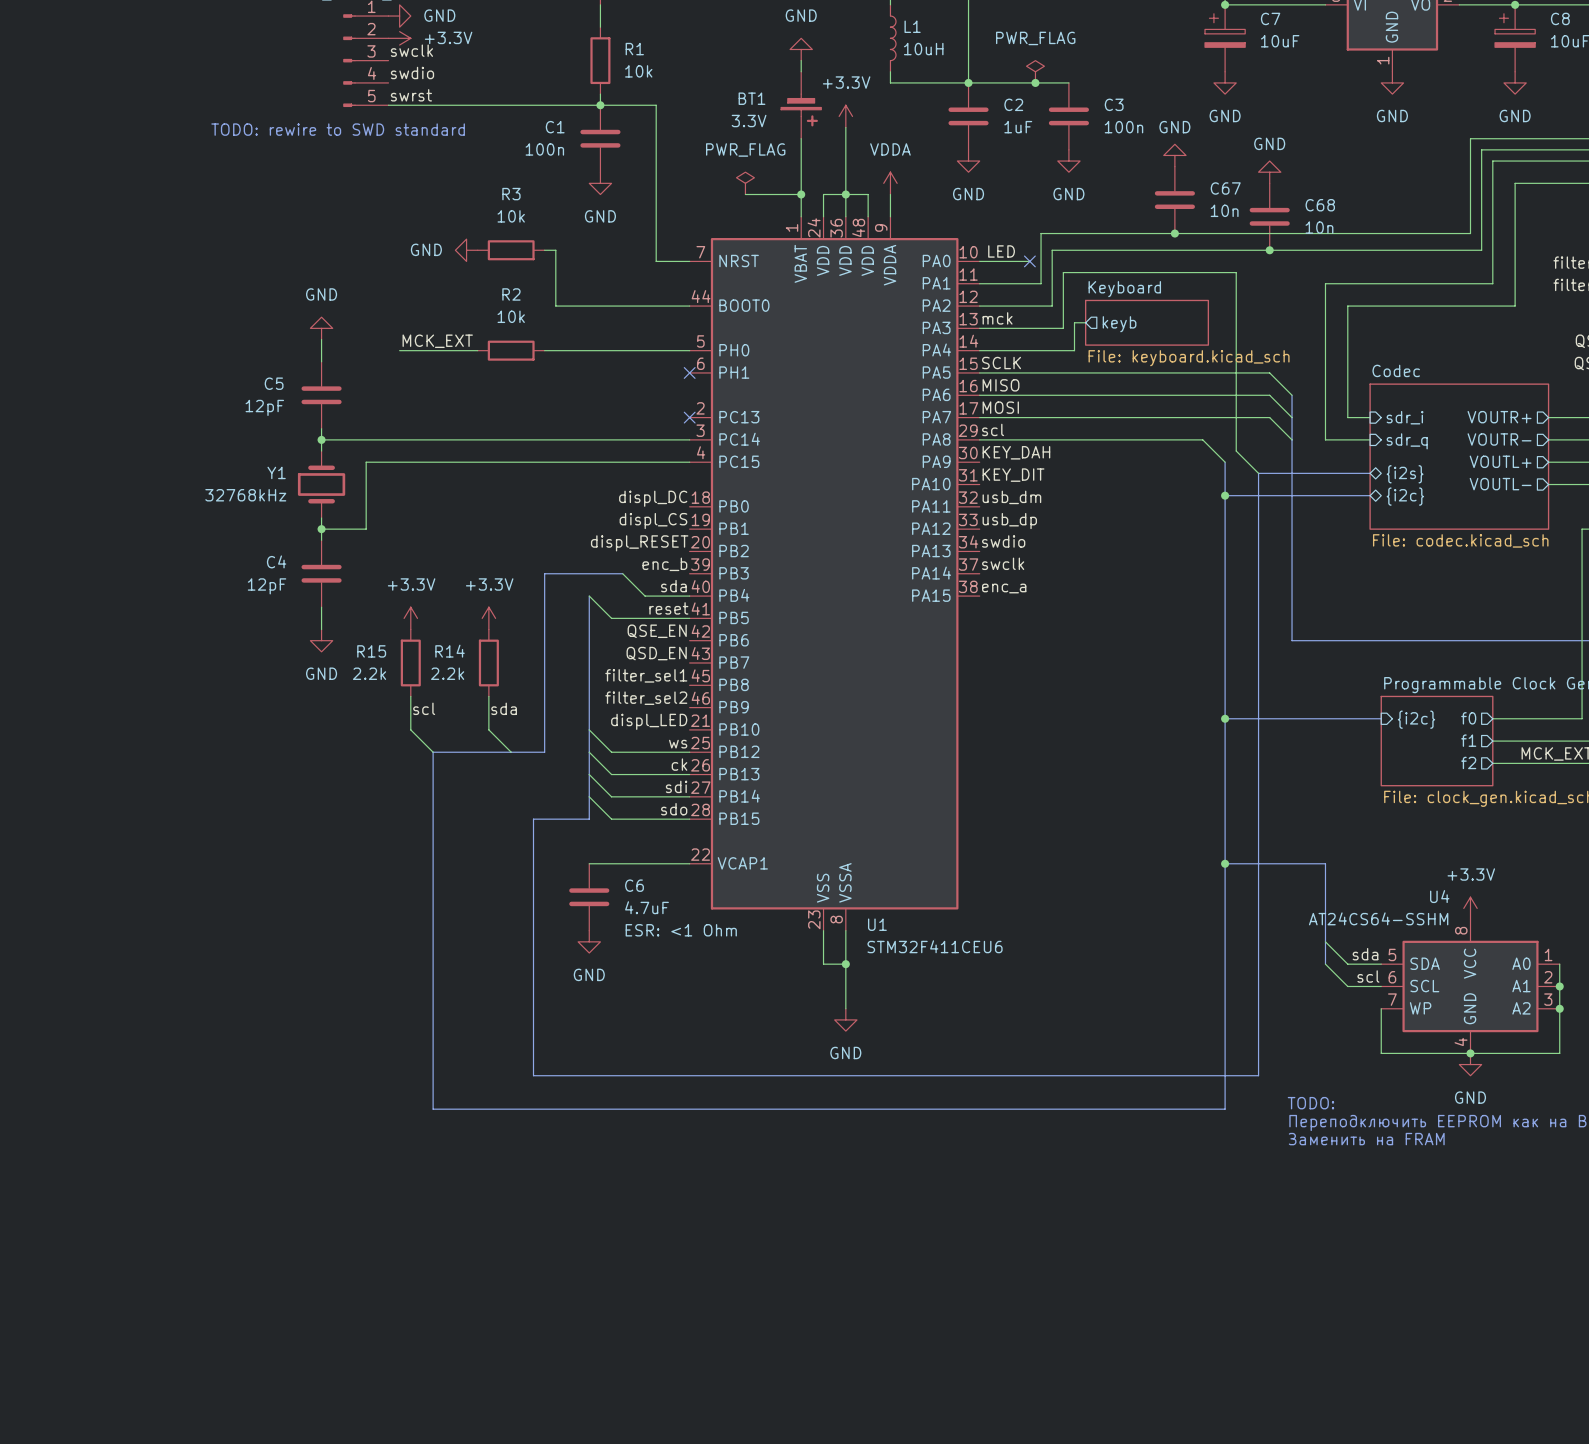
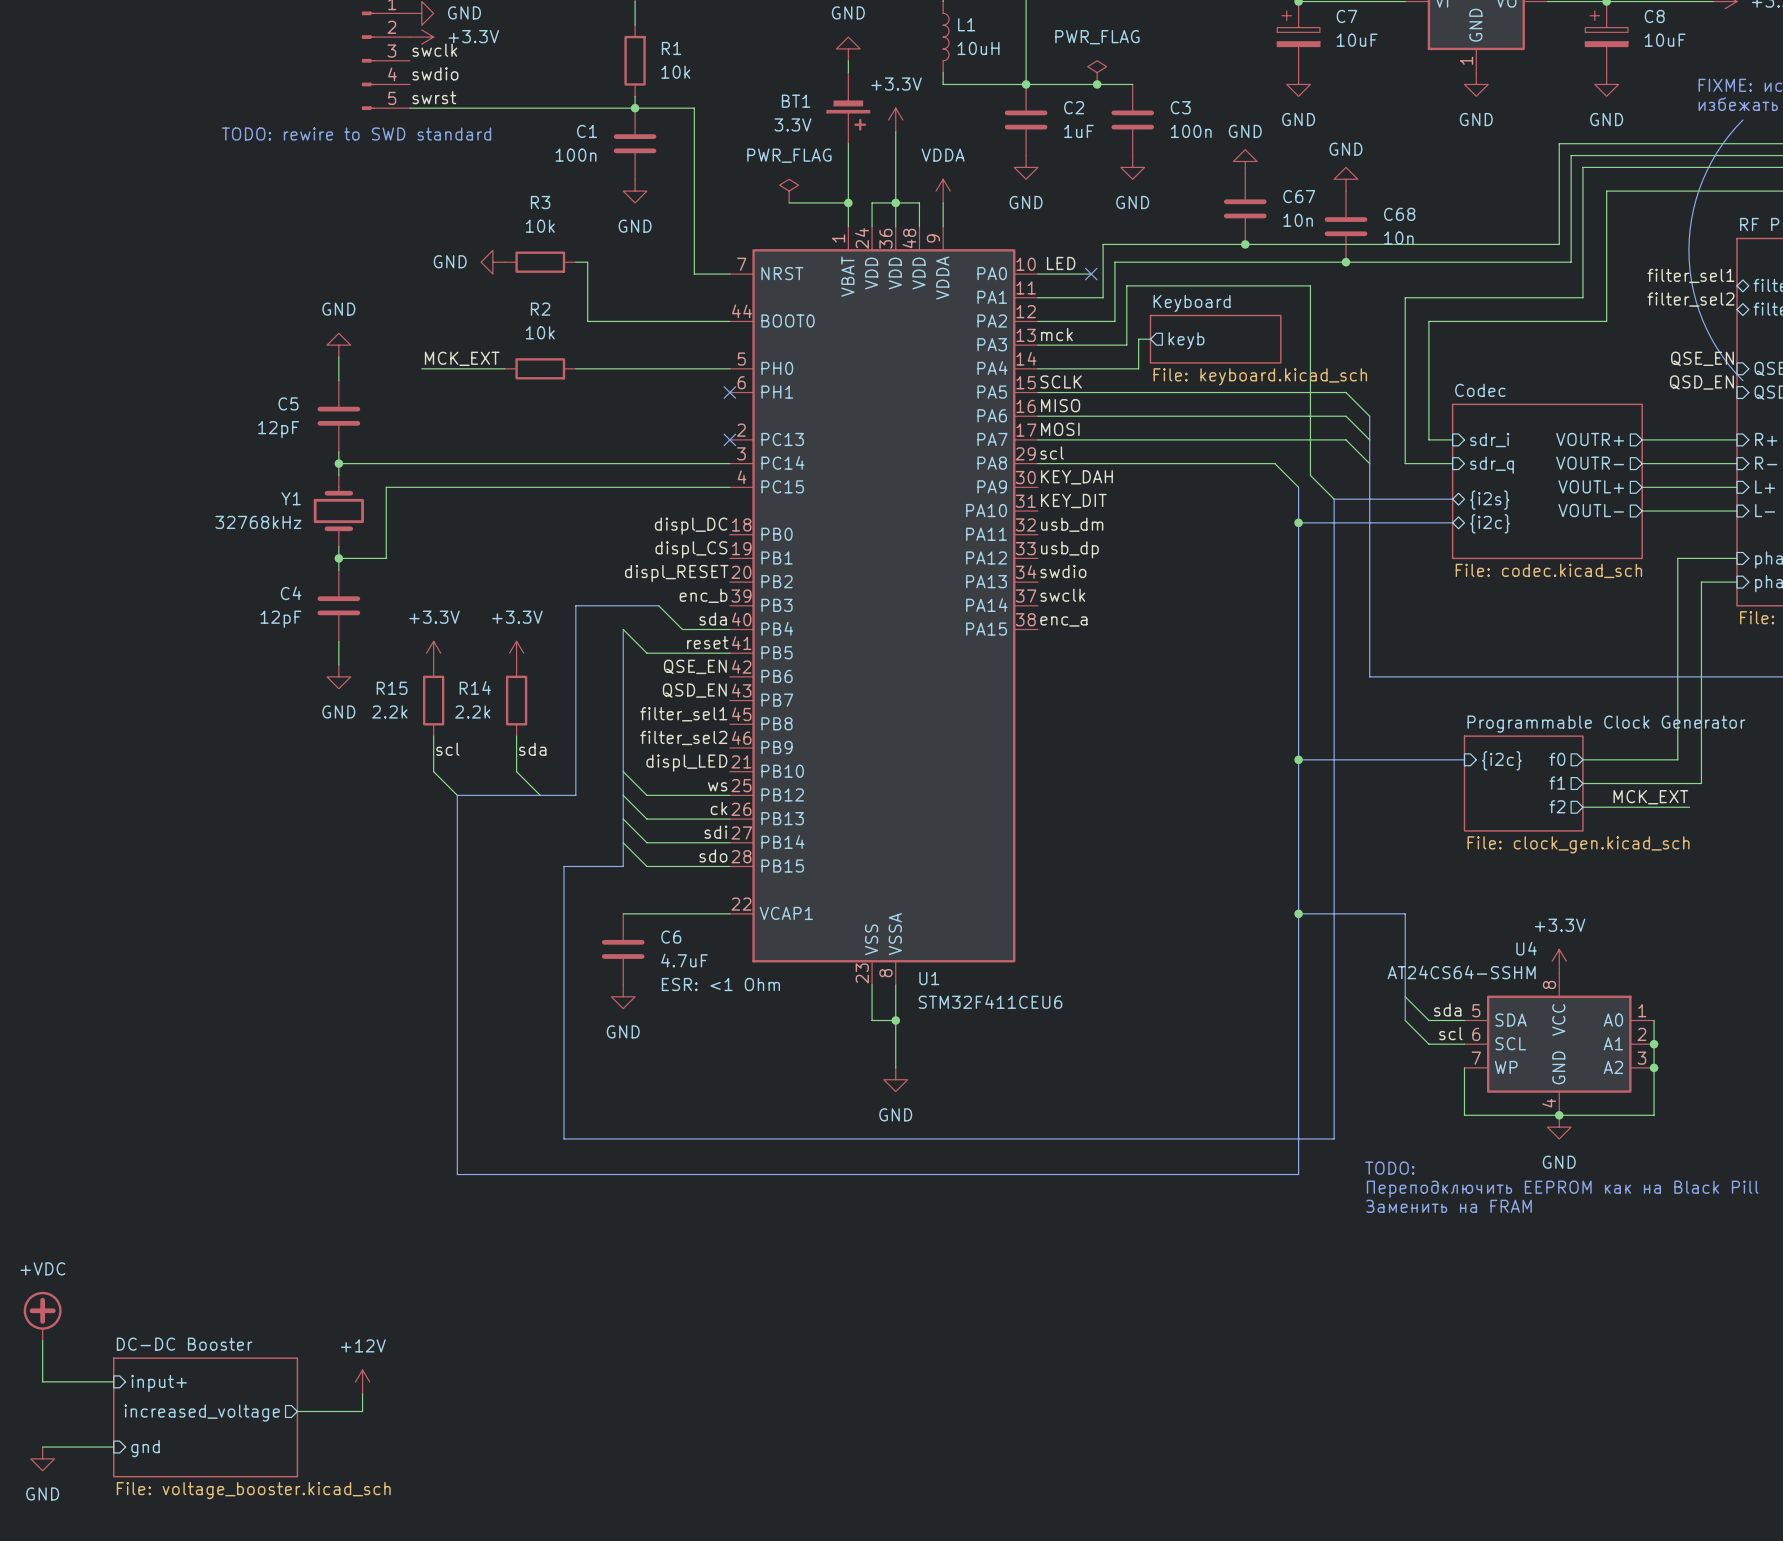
power symbol: none -> +VDC (42, 1316)
wire: none -> (42, 1340) (42, 1381) (113, 1381)
power symbol: none -> +12V (362, 1381)
sheet pin: none -> input+ (159, 1383)
wire: none -> (362, 1393) (362, 1411) (297, 1411)
sheet pin: none -> increased_voltage (202, 1413)
sheet DC-DC Booster: none -> File: voltage_booster.kicad_sch (205, 1417)
wire: none -> (42, 1447) (113, 1447)
sheet pin: none -> gnd (145, 1448)
power symbol: none -> GND (42, 1458)

